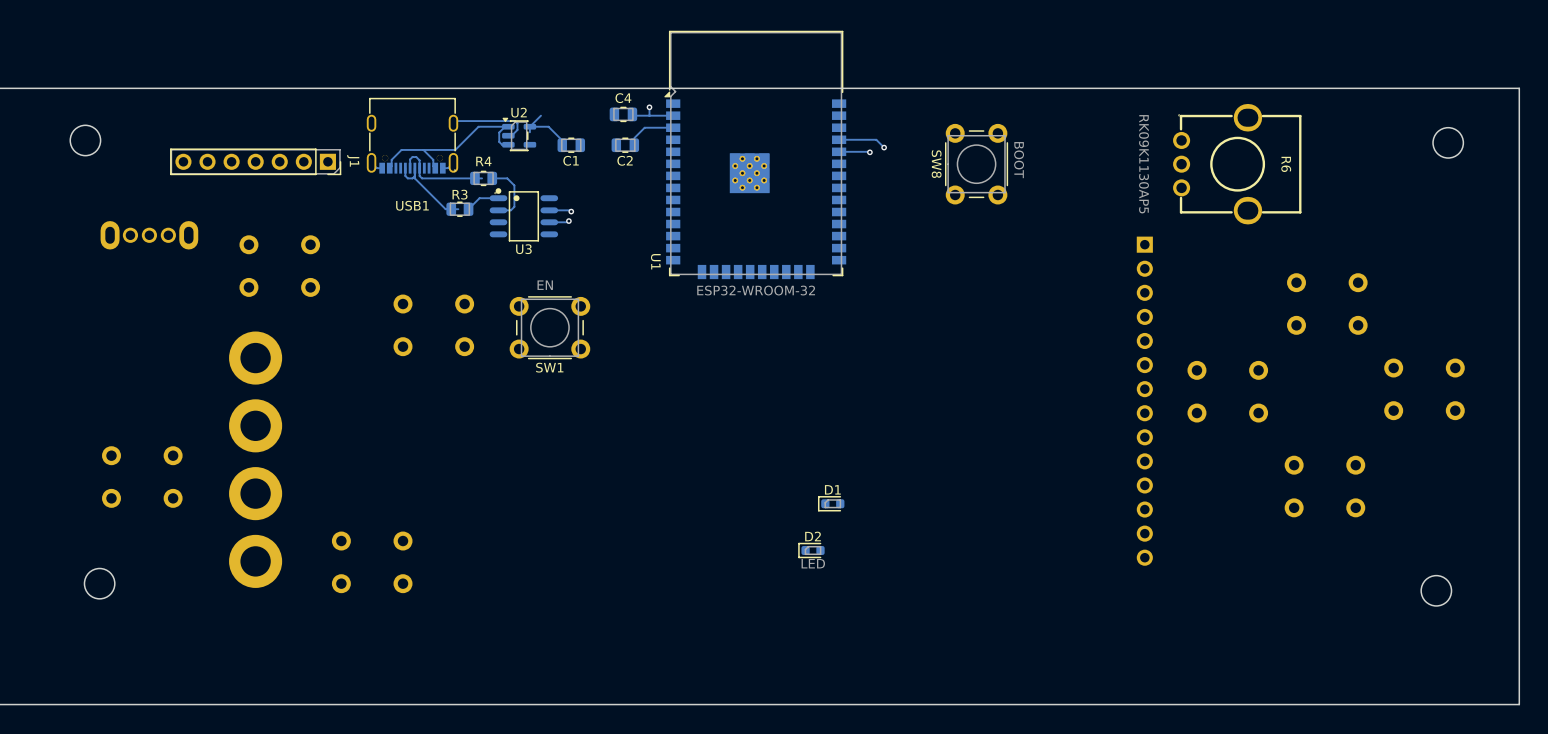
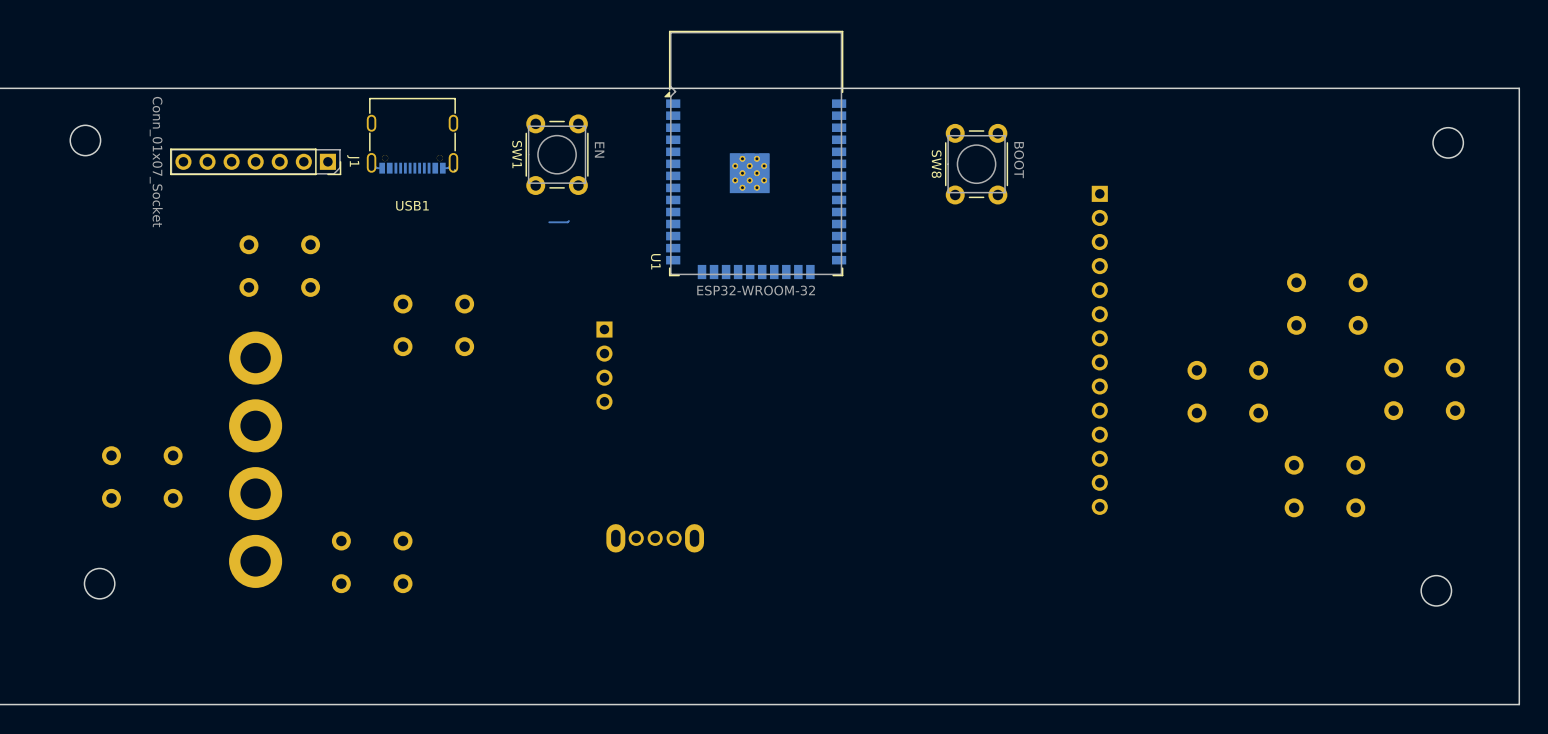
track: (649, 107) (649, 115) -> none
via: (649, 107) -> none
C4: (623, 114) -> none
track: (632, 114) (673, 115) -> none
track: (540, 115) (529, 126) -> none
track: (453, 123) (455, 121) (515, 121) (517, 123) (517, 129) (511, 135) (508, 135) -> none
track: (505, 126) (499, 132) (499, 141) (502, 144) (508, 144) -> none
track: (511, 126) (478, 126) (455, 149) (401, 149) (391, 159) (389, 168) -> none
track: (529, 126) (548, 126) (562, 140) -> none
track: (529, 126) (529, 132) -> none
track: (673, 127) (644, 127) (634, 138) -> none
U2: (519, 134) -> none
track: (839, 139) (876, 139) (884, 147) -> none
C1: (571, 145) -> none
C2: (625, 145) -> none
via: (884, 147) -> none
track: (423, 149) (433, 159) (435, 168) -> none
track: (839, 151) (869, 152) -> none
via: (869, 152) -> none
J1 value: none -> Conn_01x07_Socket (156, 162)
R6: RK09K1130AP5 (1237, 164) -> none
track: (405, 168) (405, 175) (407, 178) (414, 176) -> none
track: (410, 168) (410, 159) (416, 157) (419, 160) (419, 175) (422, 178) (482, 178) -> none
track: (414, 168) (414, 178) (445, 209) (458, 209) -> none
R4: (483, 178) -> none
track: (492, 178) (507, 178) (514, 185) (514, 206) (510, 210) (498, 210) -> none
track: (498, 198) (479, 198) (468, 209) -> none
R3: (459, 209) -> none
track: (549, 210) (571, 211) -> none
via: (571, 211) -> none
U3: (523, 214) -> none
via: (568, 221) -> none
part: (149, 235) -> none
SW1 rotation: 0° (549, 327) -> 90° clockwise (557, 154)
SW1 position: (549, 327) -> (557, 154)
part: none -> (604, 365)
part position: (1144, 401) -> (1099, 350)
D1: (831, 503) -> none
part: none -> (655, 538)
D2: LED (811, 550) -> none

